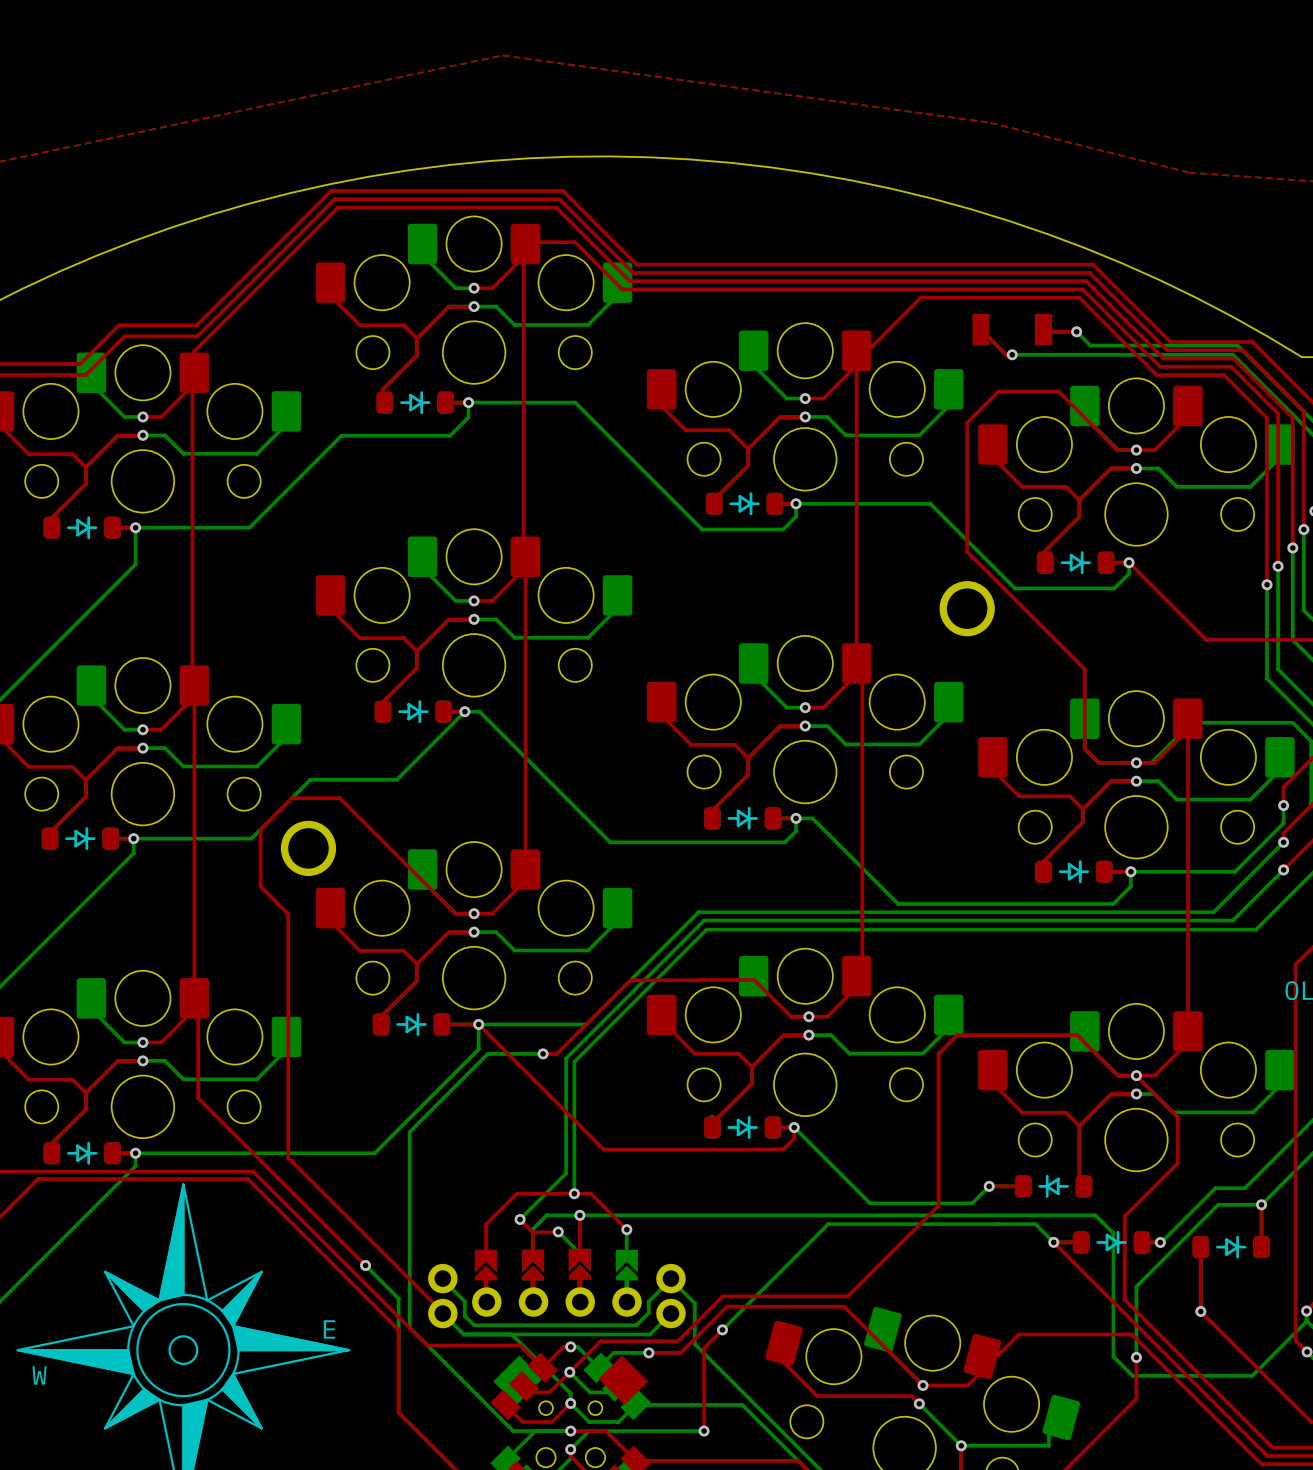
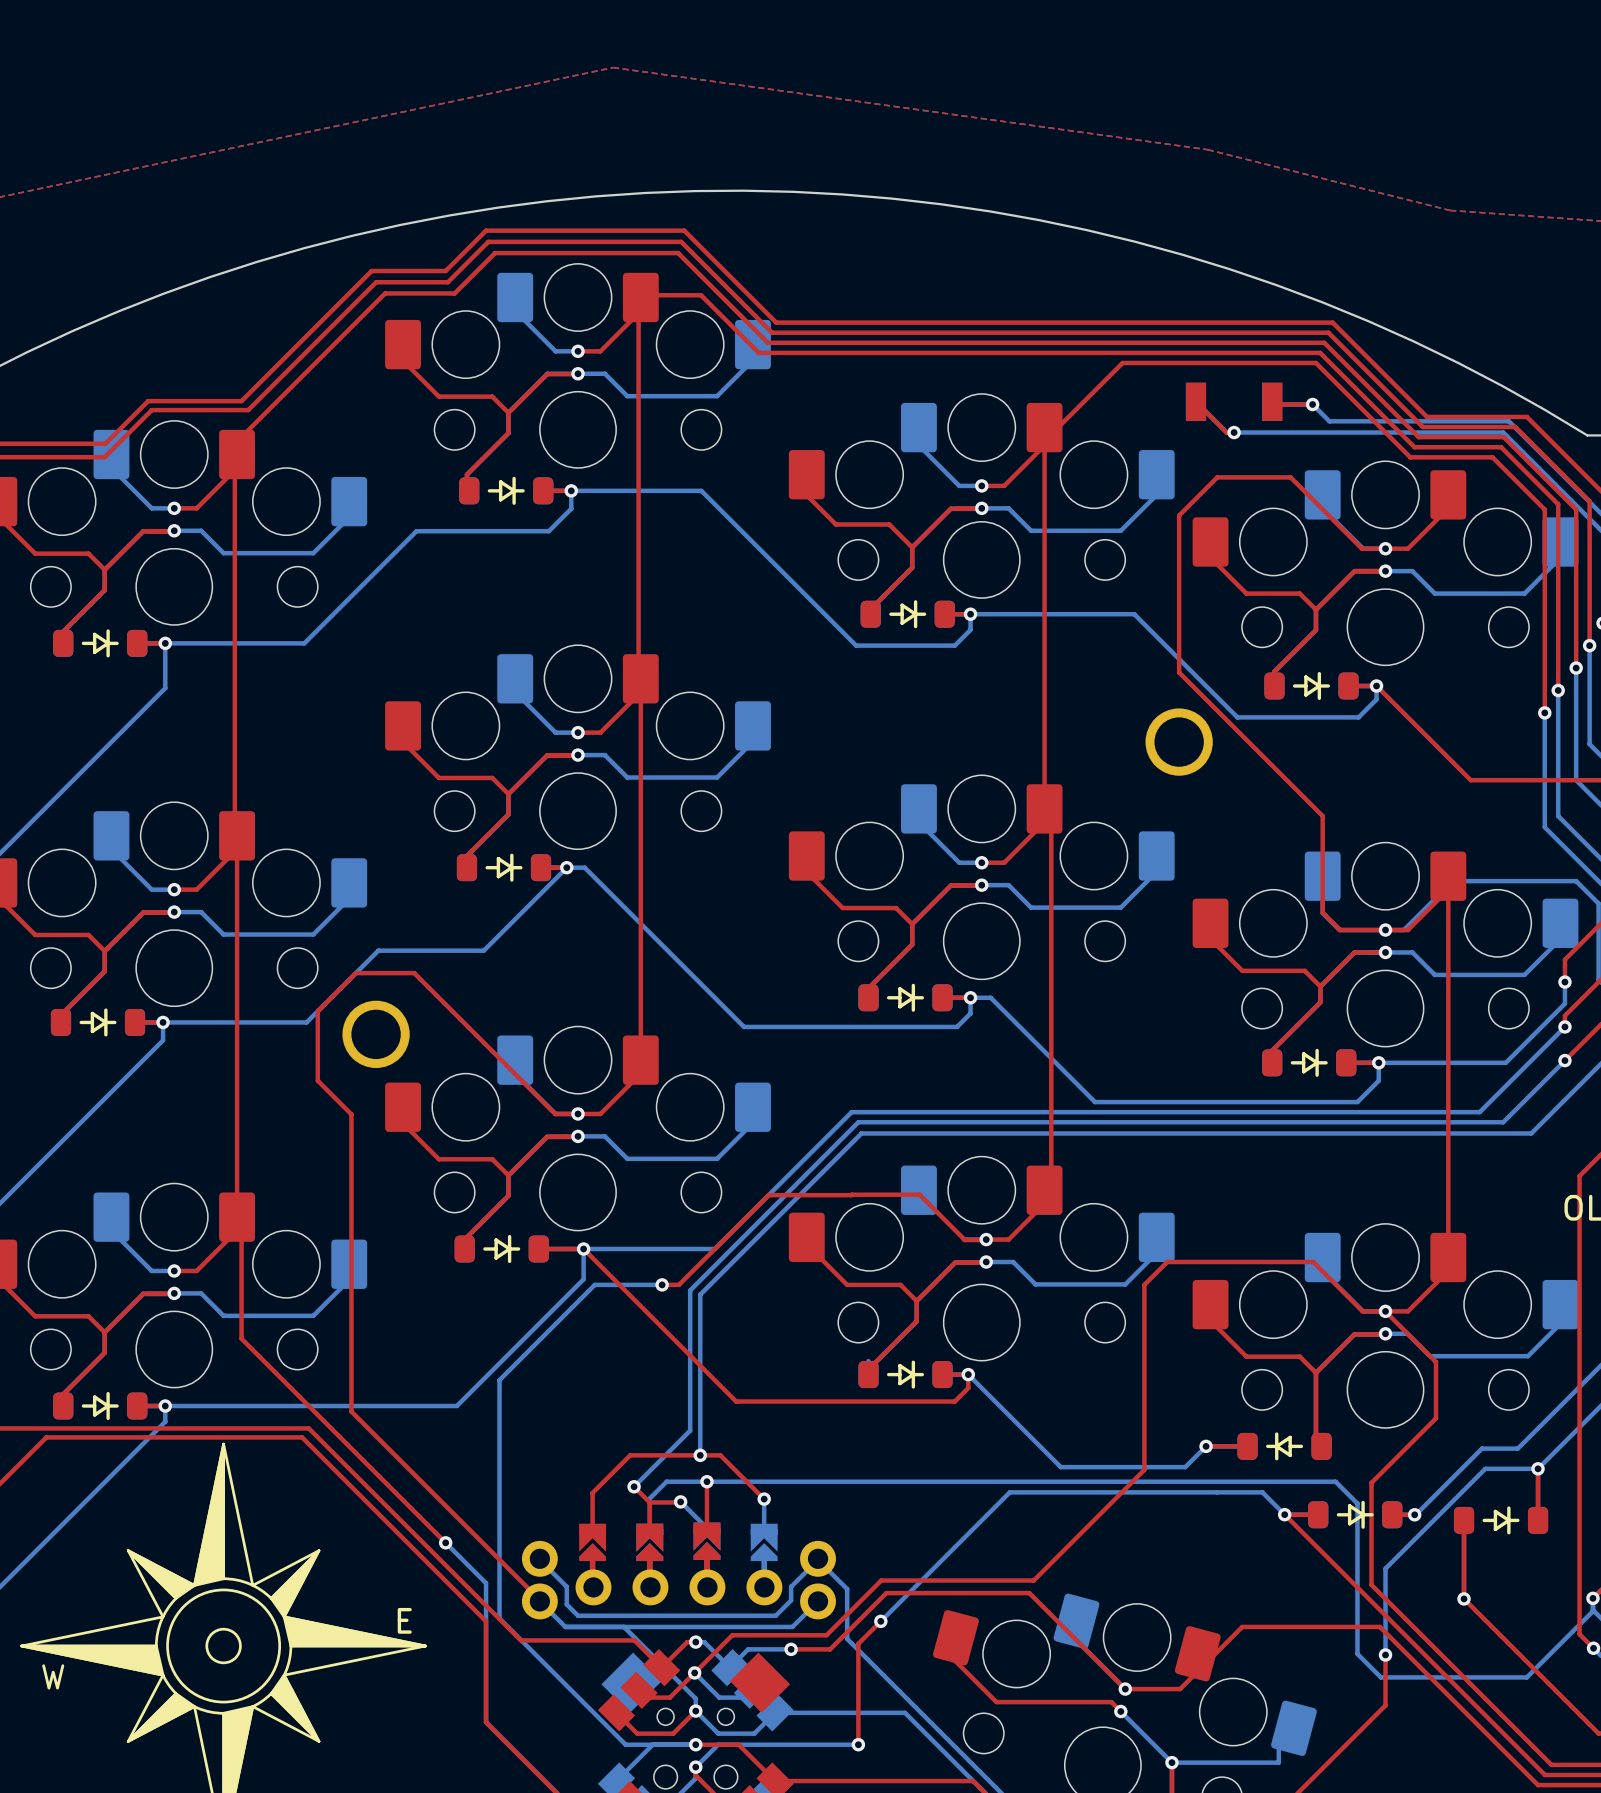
top track: (563, 191) (331, 191) (196, 325) (119, 325) (80, 363) -> (686, 232) (684, 230) (486, 230) (445, 271) (371, 271) (241, 401) (148, 401) (105, 443) (98, 443)
top track: (559, 199) (334, 199) (197, 336) -> (682, 242) (488, 241) (447, 282) (376, 282) (248, 410) (240, 410)
top track: (406, 207) (337, 207) (194, 351) (194, 362) -> (495, 253) (454, 293) (385, 293) (237, 441)

